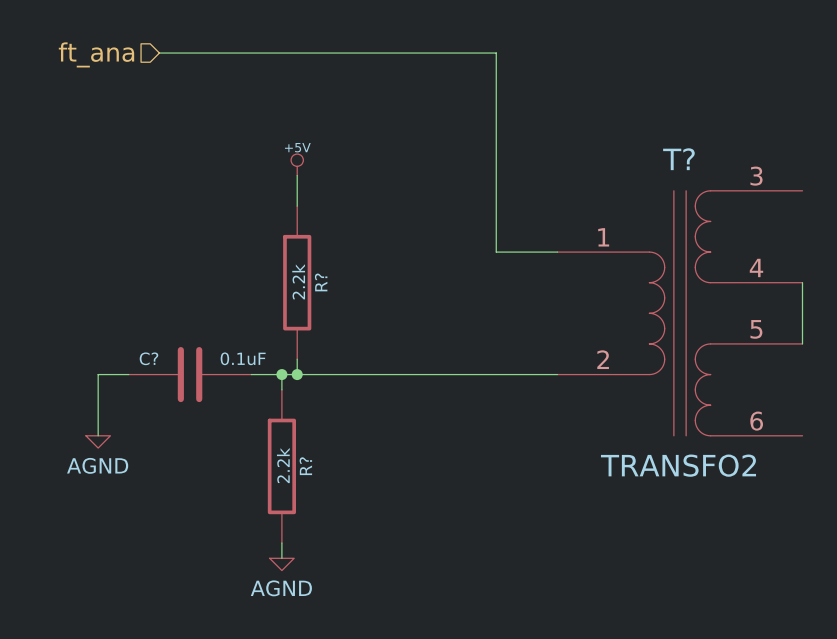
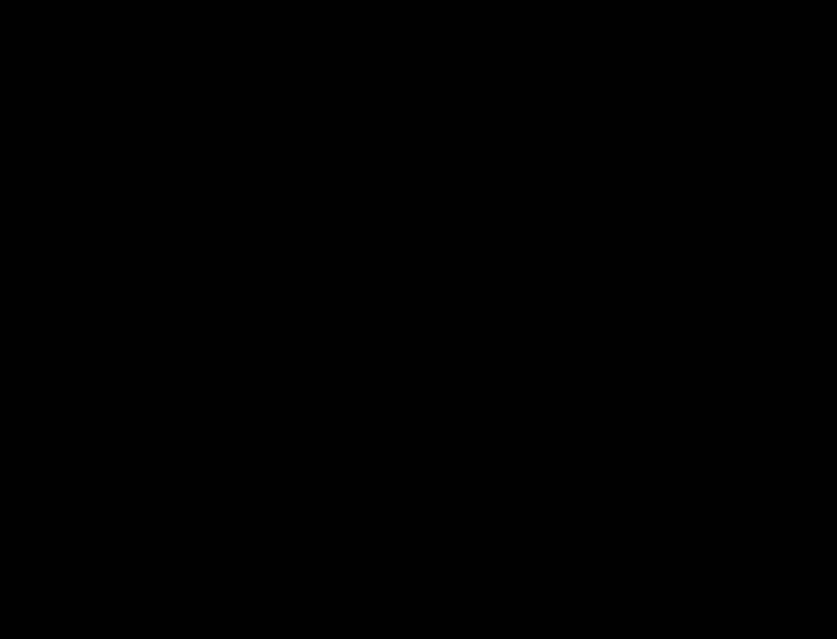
wire: (159, 53) (496, 53) (496, 252) (557, 252) -> none
hierarchical label: ft_ana (96, 54) -> none
power symbol: +5V (297, 164) -> none
wire: (297, 175) (297, 206) -> none
R?: 2.2k (297, 282) -> none
wire: (802, 282) (802, 343) -> none
T?: TRANSFO2 (680, 313) -> none
wire: (297, 359) (297, 374) -> none
wire: (128, 374) (98, 374) (98, 435) -> none
C?: 0.1uF (190, 374) -> none
wire: (251, 374) (557, 374) -> none
wire: (281, 374) (281, 389) -> none
junction: (281, 374) -> none
junction: (297, 374) -> none
power symbol: AGND (98, 441) -> none
R?: 2.2k (281, 466) -> none
wire: (281, 542) (281, 558) -> none
power symbol: AGND (281, 564) -> none

